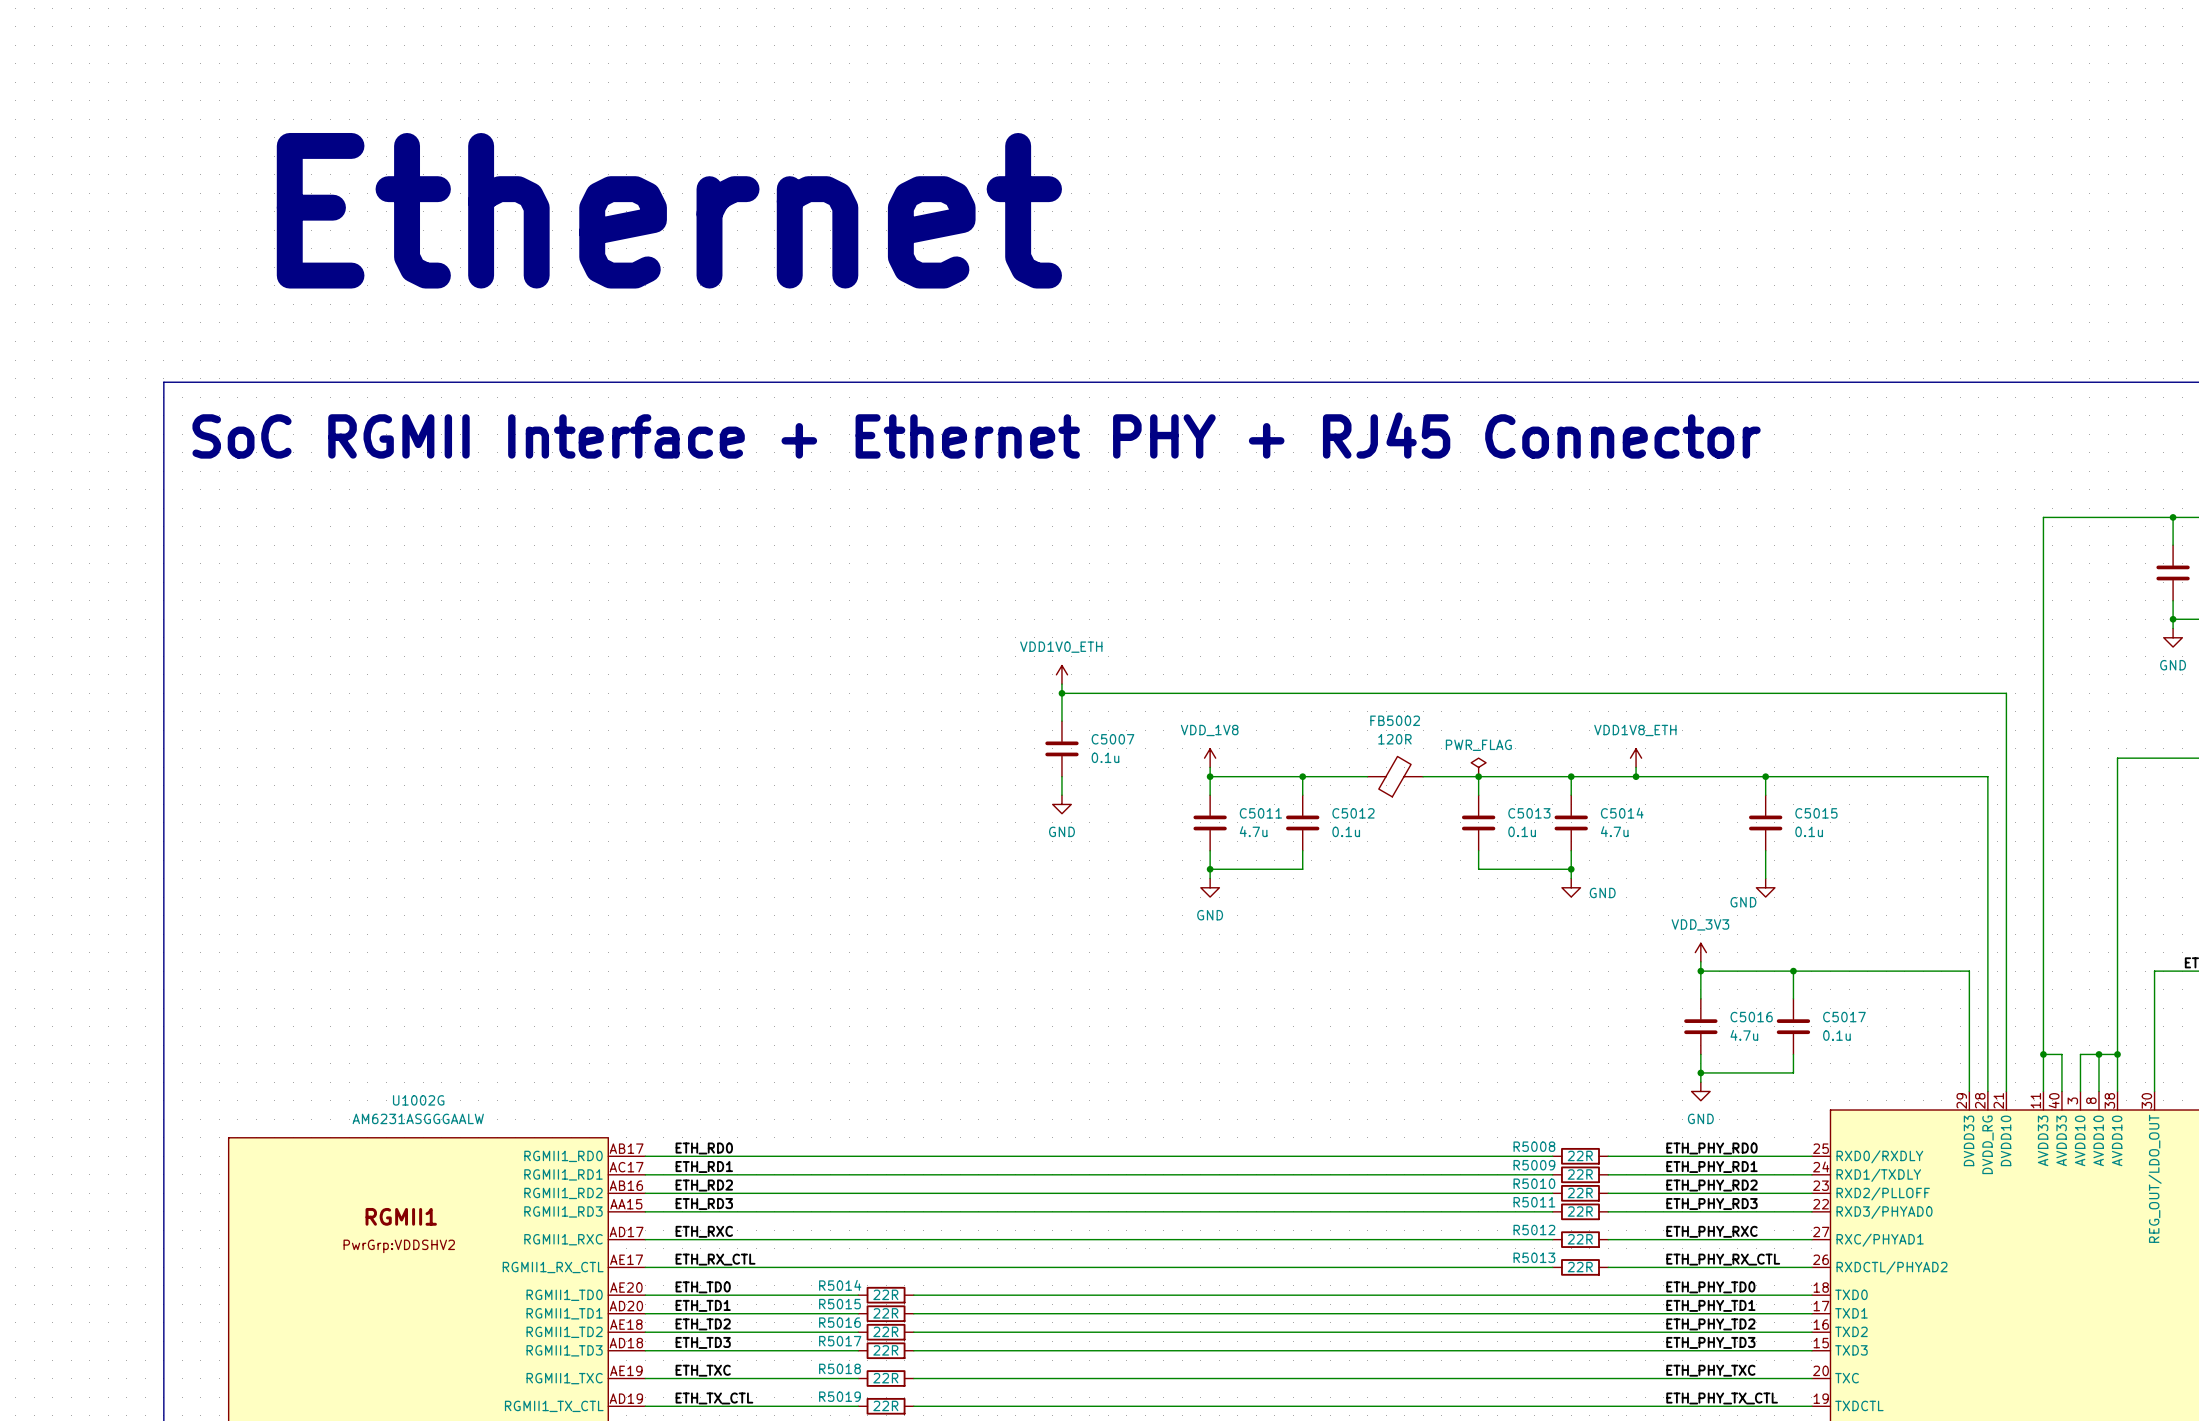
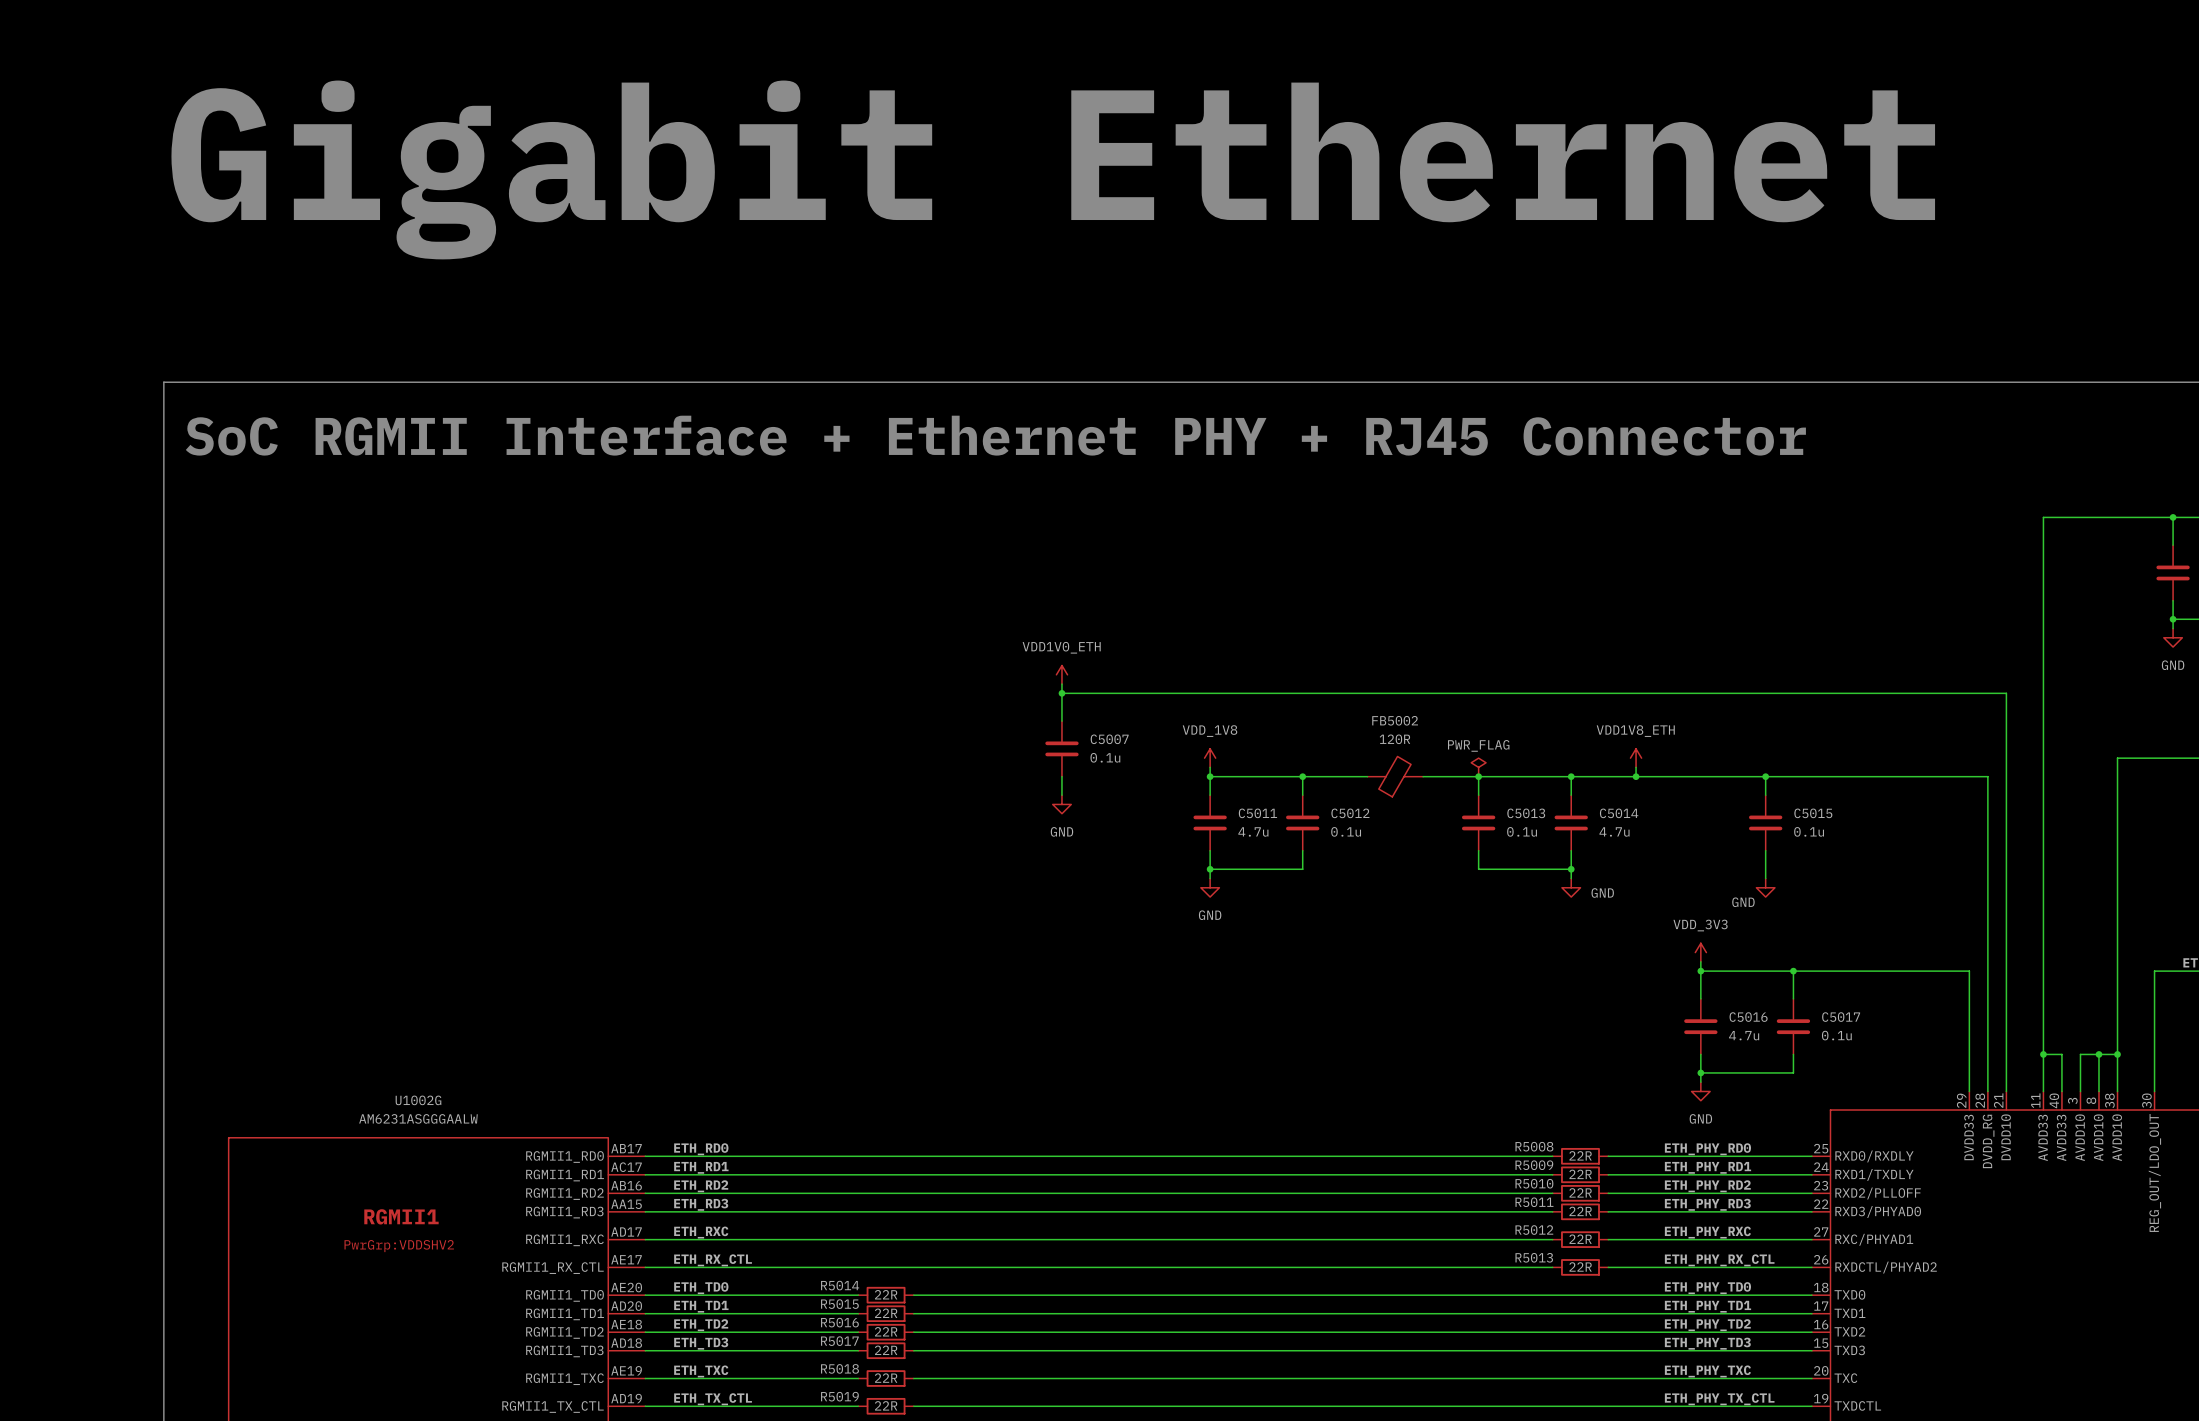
text: none -> Gigabit Ethernet (1053, 169)
text: Ethernet (669, 210) -> none

